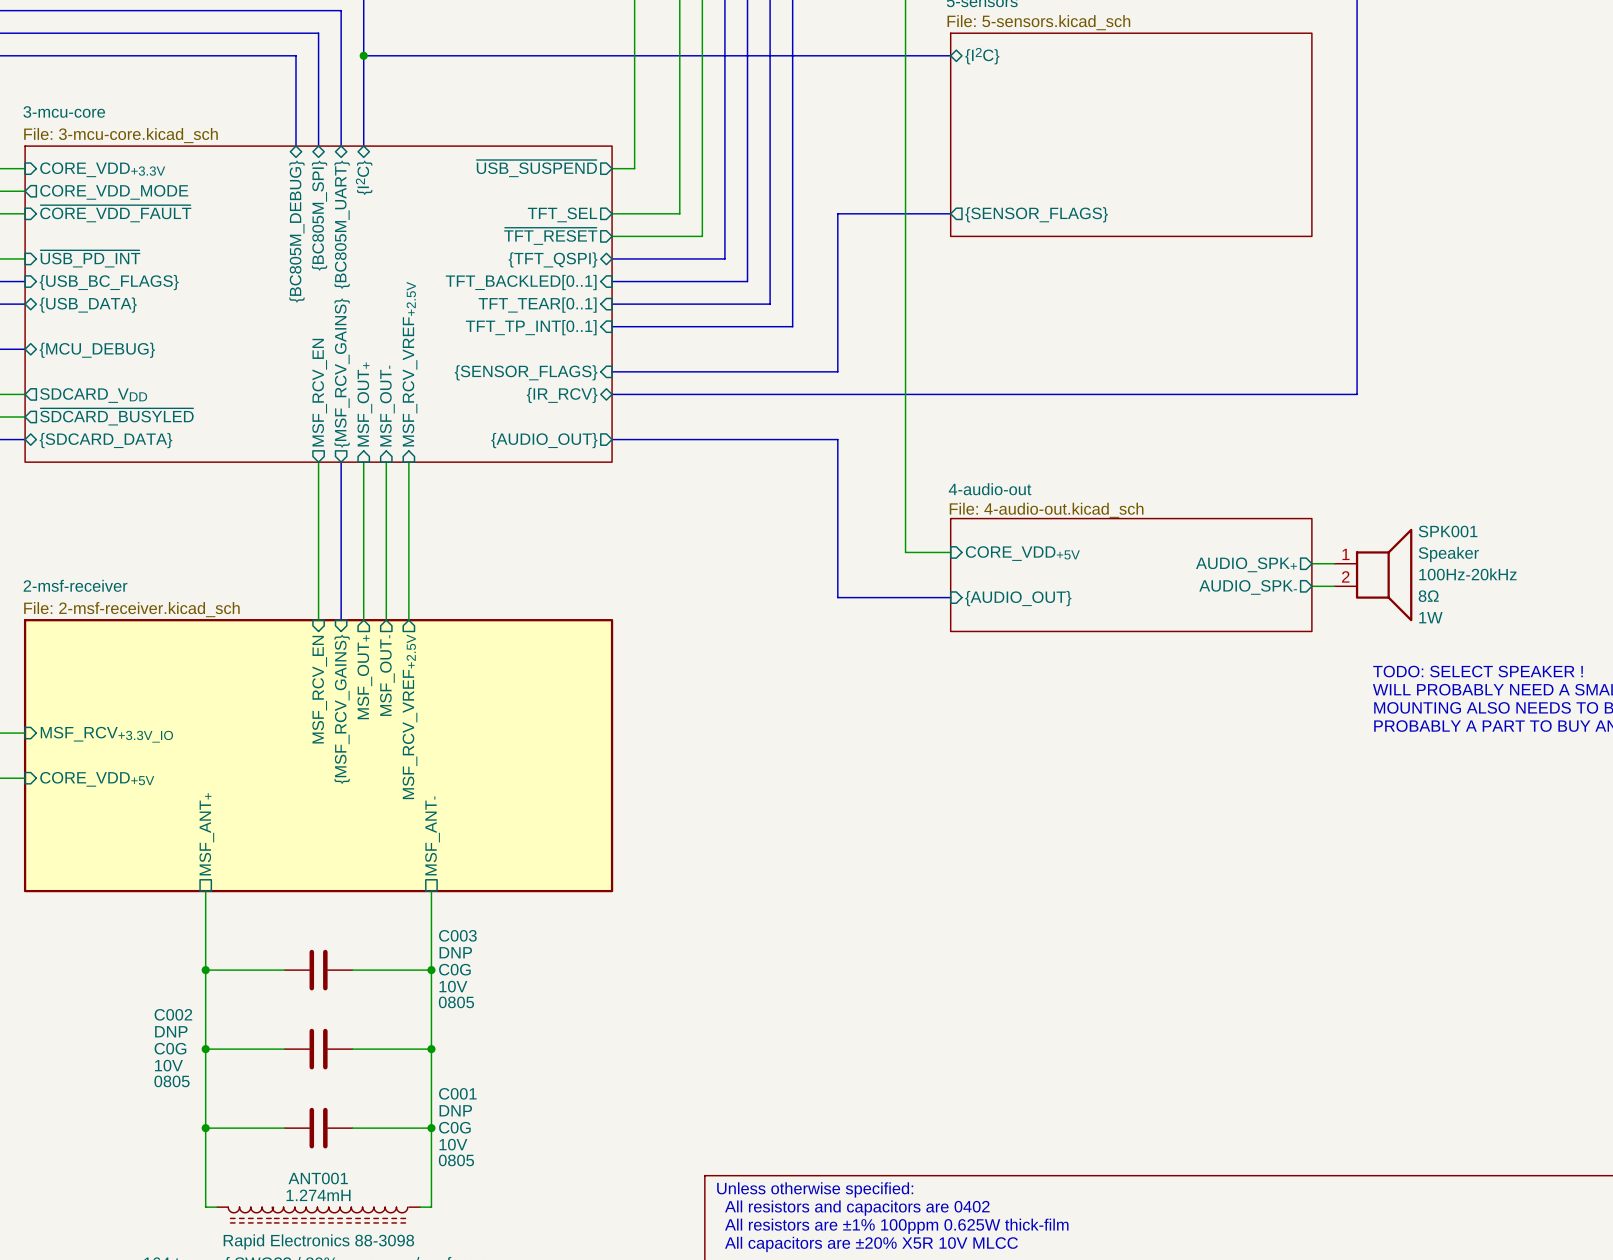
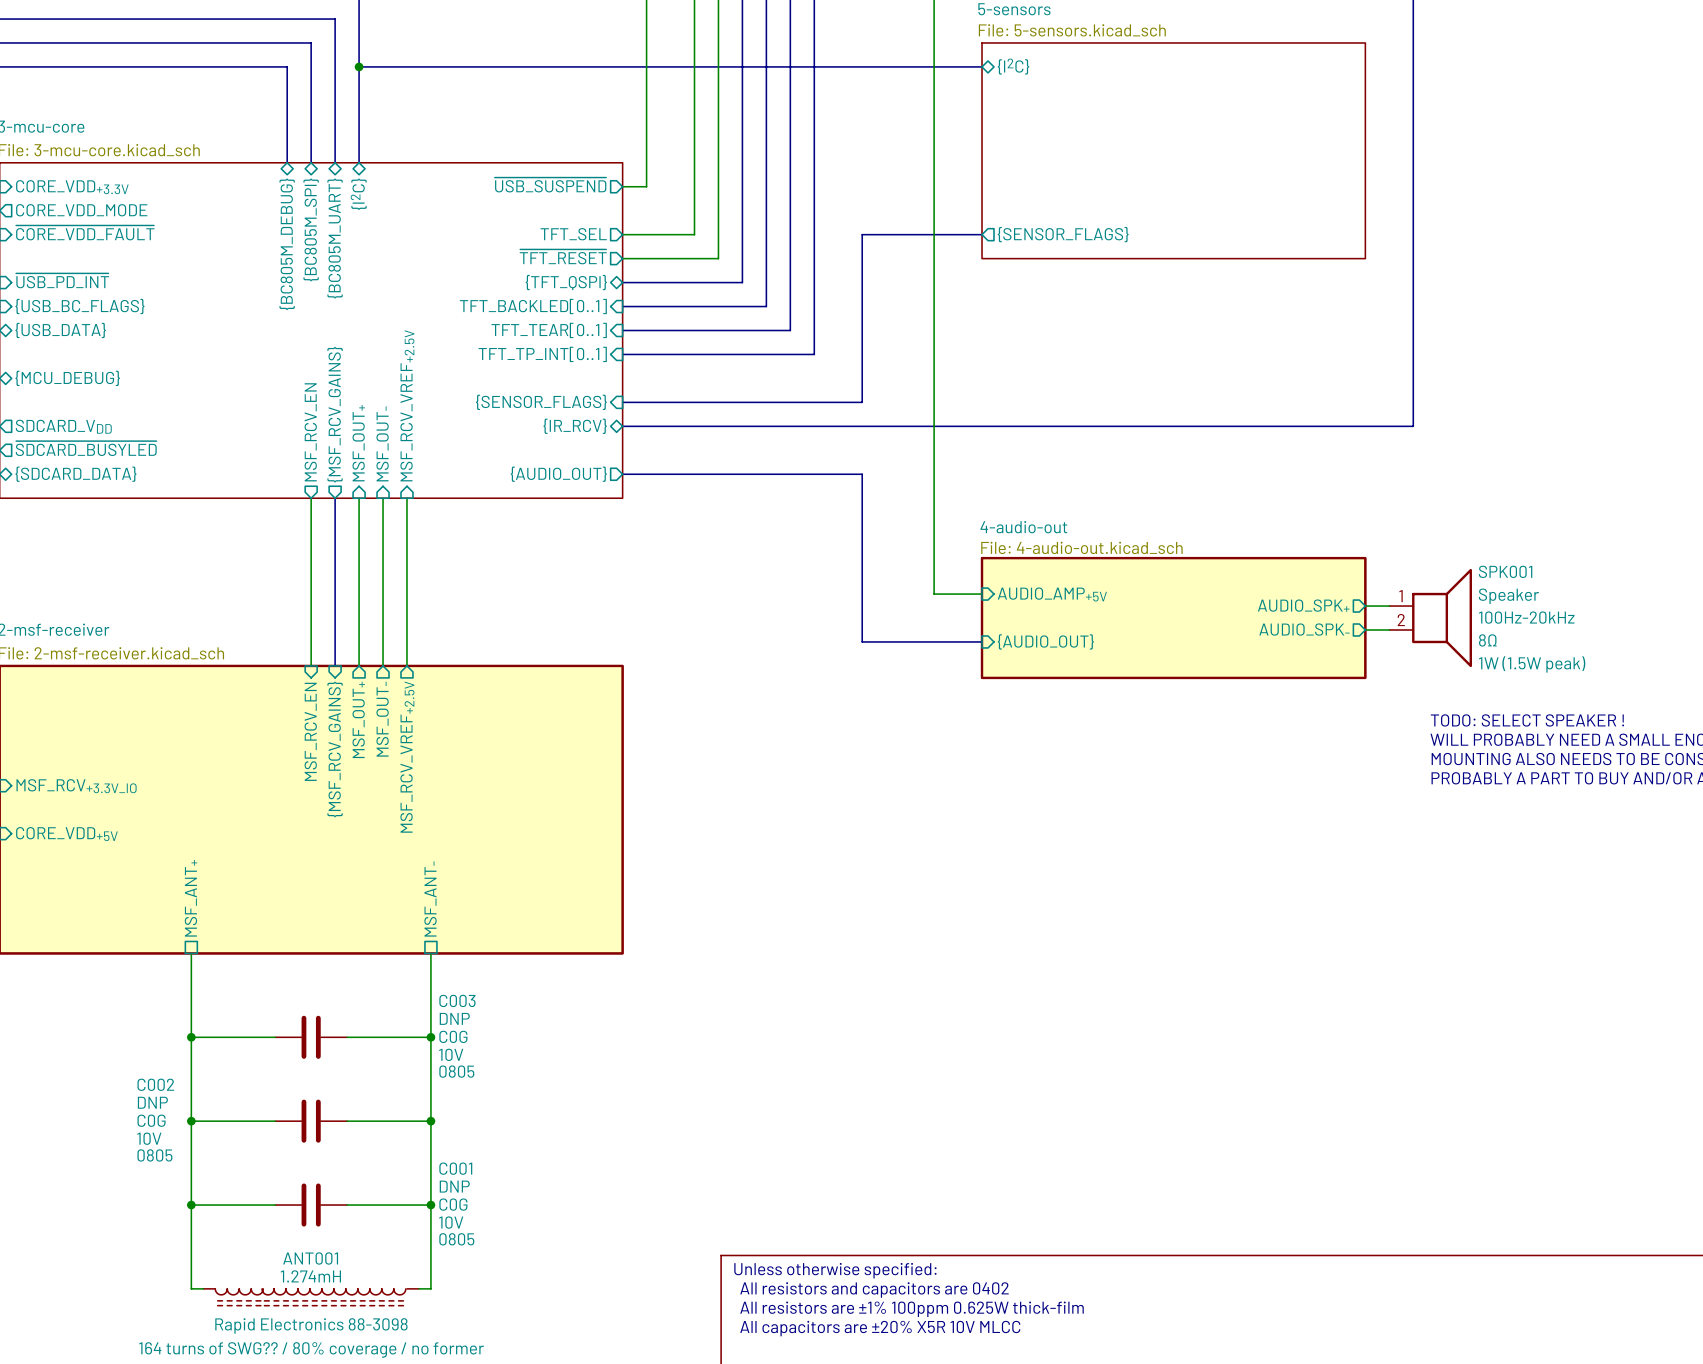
sheet pin: CORE_VDD+5V (1022, 553) -> AUDIO_AMP+5V (1052, 594)
part: none -> (1173, 618)
SPK001 text: 1W (1430, 617) -> 1W (1.5W peak) (1532, 664)

